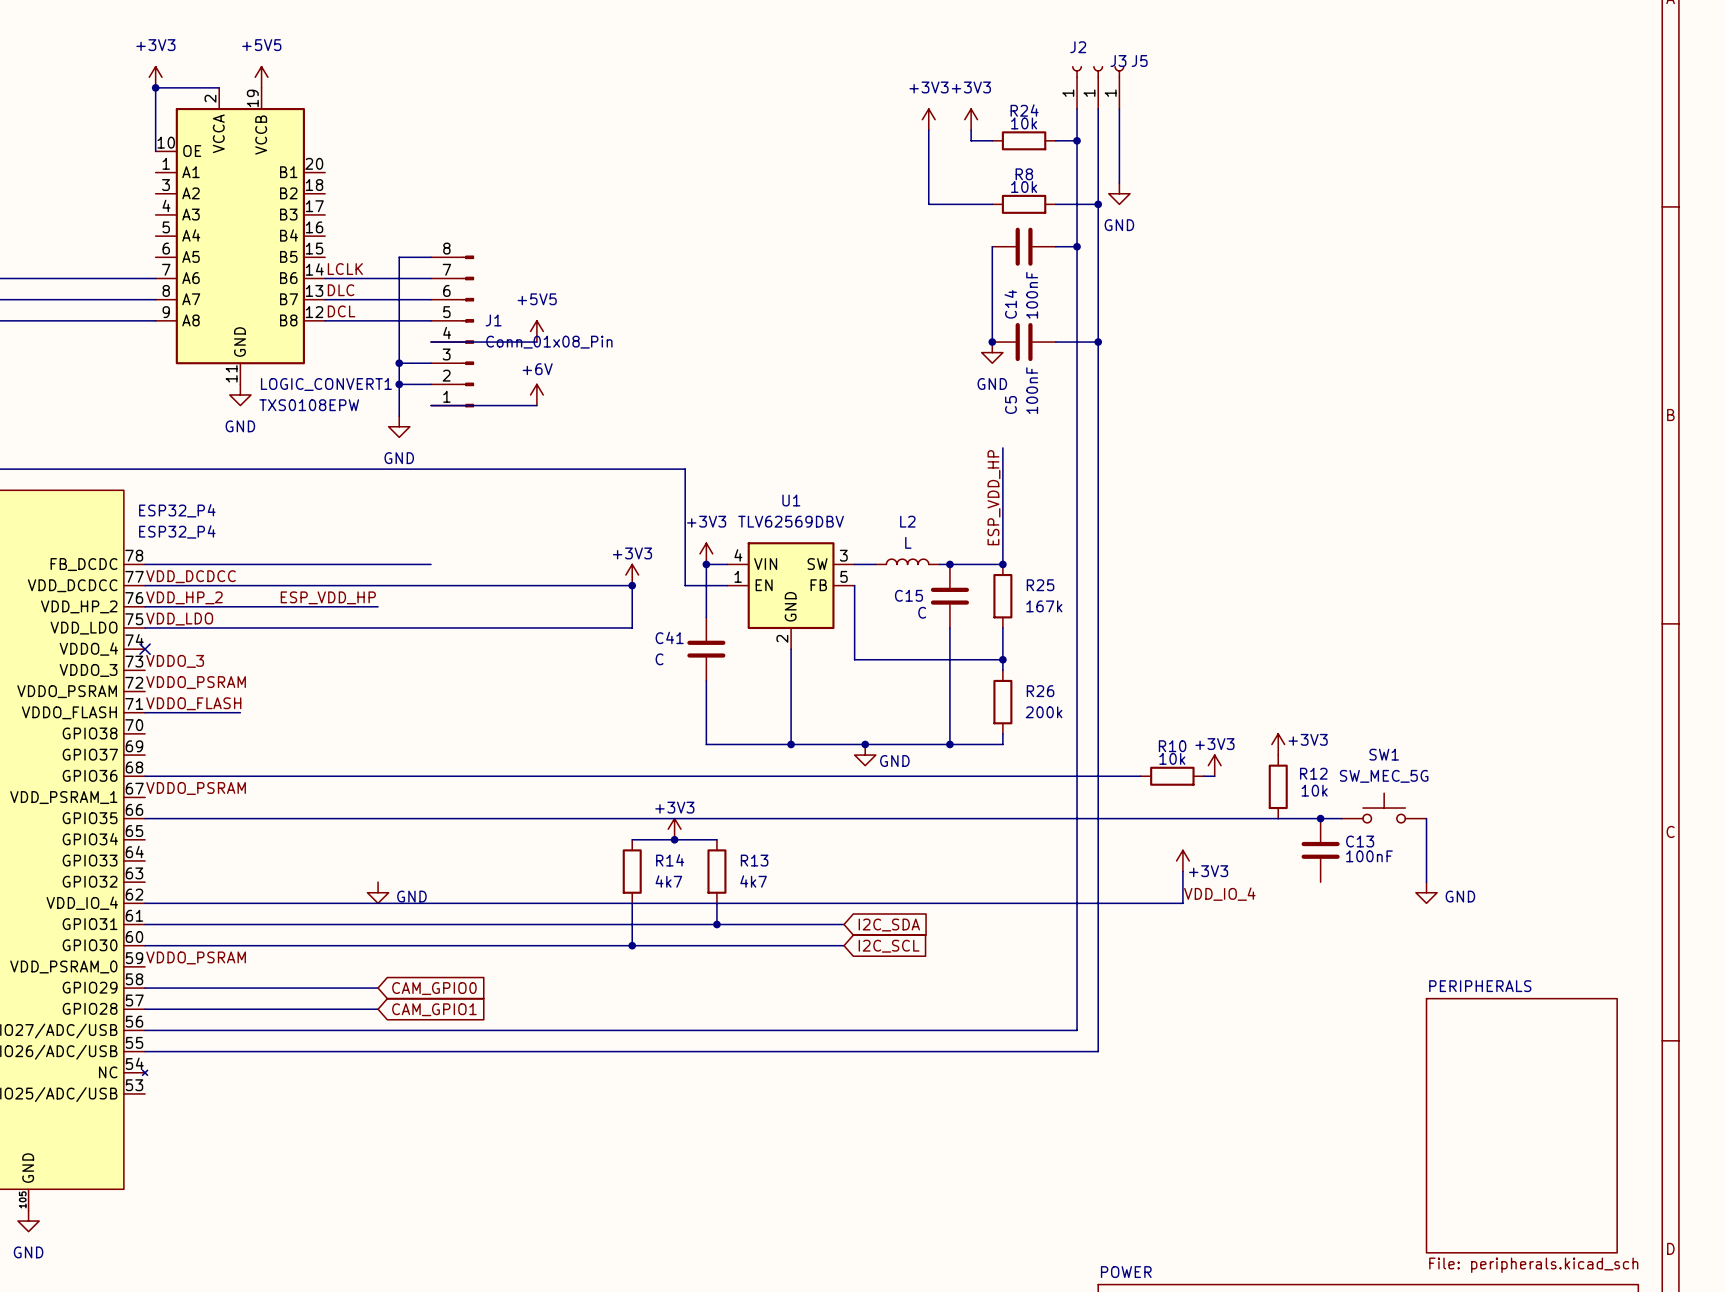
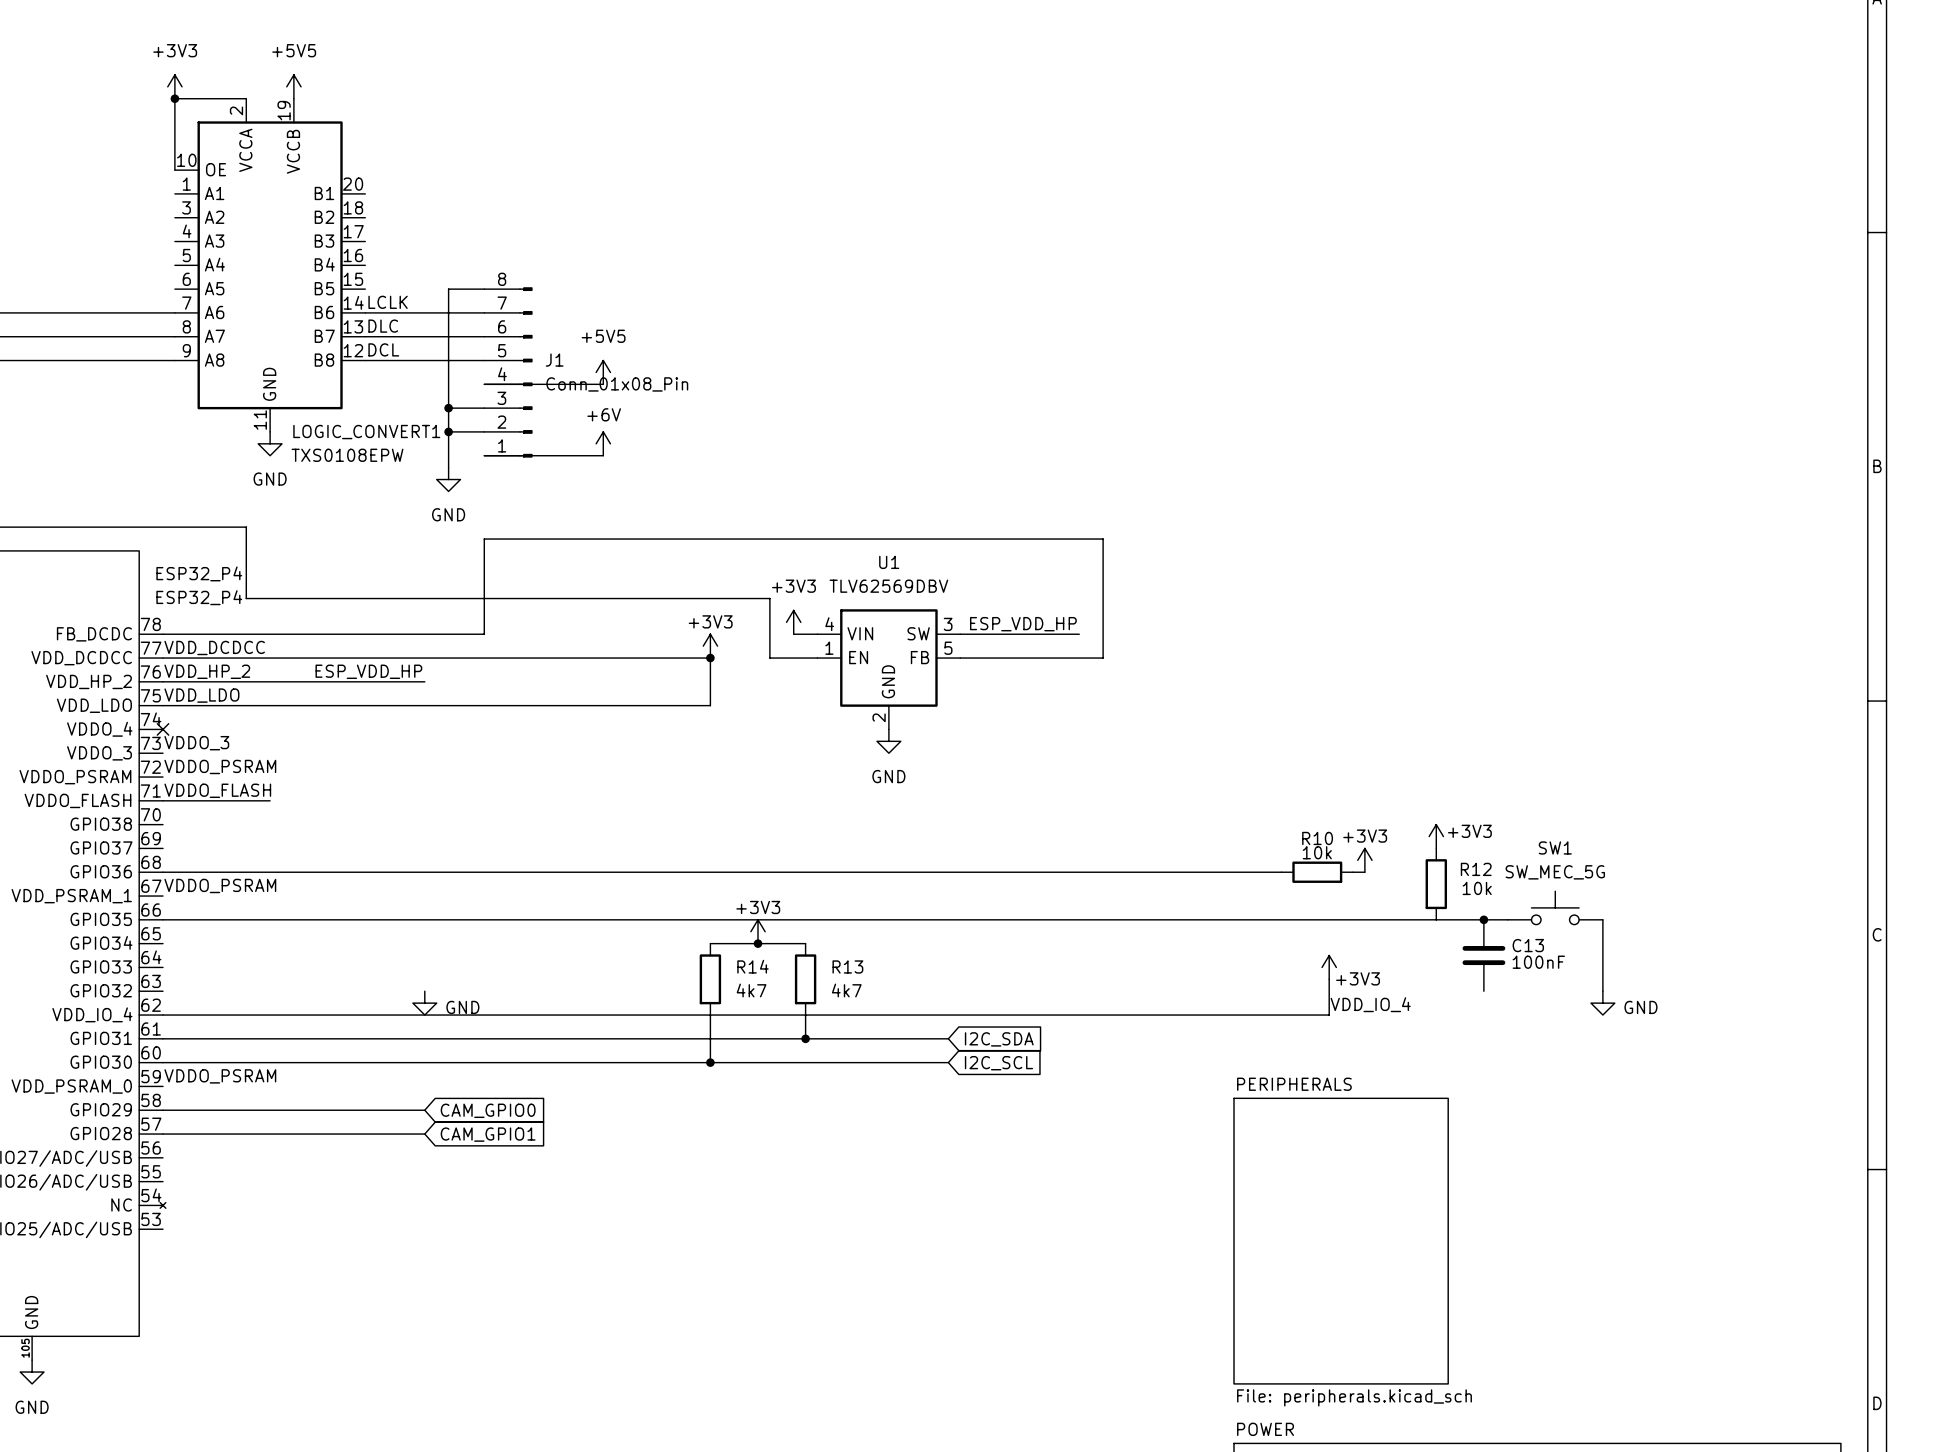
J2: (1077, 87) -> none
J3: (1098, 87) -> none
J5: (1119, 87) -> none
wire: (1077, 109) (1077, 1030) (145, 1030) -> none
wire: (1098, 109) (1098, 1051) (145, 1051) -> none
wire: (1119, 109) (1119, 183) -> none
power symbol: +3V3 (928, 119) -> none
power symbol: +3V3 (971, 119) -> none
wire: (928, 130) (928, 204) (992, 204) -> none
wire: (971, 130) (971, 140) (992, 140) -> none
R24: 10k (1024, 140) -> none
wire: (1055, 140) (1077, 140) -> none
junction: (1077, 140) -> none
power symbol: GND (1119, 193) -> none
R8: 10k (1024, 204) -> none
wire: (1055, 204) (1098, 204) -> none
junction: (1098, 204) -> none
wire: (992, 246) (992, 342) -> none
C14: 100nF (1024, 246) -> none
wire: (1055, 246) (1077, 246) -> none
junction: (1077, 246) -> none
junction: (992, 342) -> none
C5: 100nF (1024, 342) -> none
wire: (1055, 342) (1098, 342) -> none
junction: (1098, 342) -> none
power symbol: GND (992, 352) -> none
wire: (1002, 447) (1002, 564) (960, 564) -> none
wire: (219, 469) (685, 469) (685, 532) -> (246, 527) (246, 598) (769, 598)
label rotation: 0° (993, 497) -> 90° clockwise (1023, 624)
L2: L (907, 561) -> none
wire: (706, 564) (706, 617) -> none
junction: (706, 564) -> none
wire: none -> (984, 634) (1055, 634)
junction: (949, 564) -> none
junction: (1002, 564) -> none
wire: (854, 585) (854, 659) (1002, 659) -> (960, 658) (1103, 658) (1103, 539) (484, 539) (484, 634)
C15: C (949, 596) -> none
R25: 167k (1002, 596) -> none
wire: (949, 627) (949, 744) -> none
wire: (1002, 627) (1002, 670) -> none
C41: C (706, 649) -> none
wire: (791, 649) (791, 744) -> none
junction: (1002, 659) -> none
wire: (706, 680) (706, 744) (1002, 744) (1002, 733) -> none
R26: 200k (1002, 702) -> none
junction: (791, 744) -> none
junction: (865, 744) -> none
junction: (949, 744) -> none
power symbol position: GND (865, 755) -> GND (888, 741)
power symbol text position: GND (894, 761) -> GND (888, 776)
sheet PERIPHERALS: none -> File: peripherals.kicad_sch (1341, 1241)
sheet PERIPHERALS: File: peripherals.kicad_sch (1521, 1125) -> none

